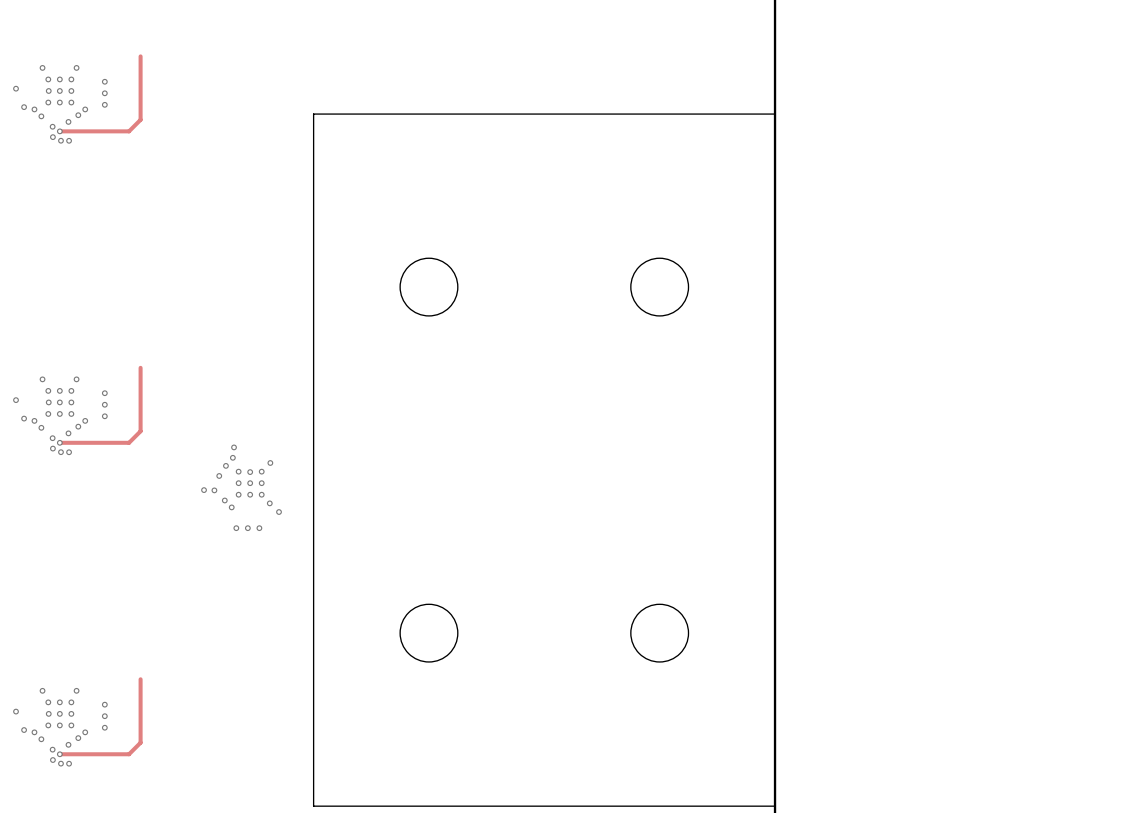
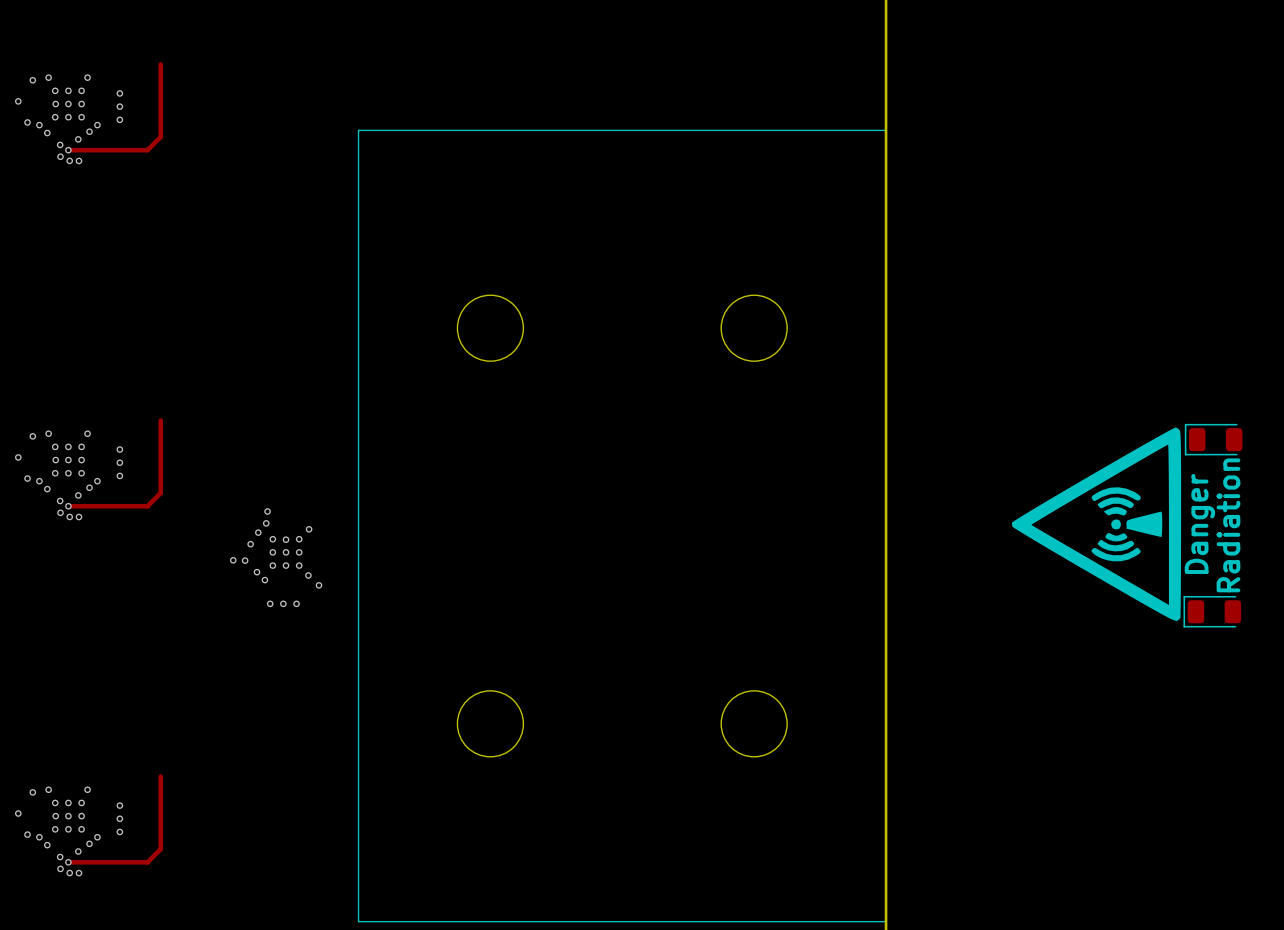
via: none -> (32, 80)
drawing: none -> [1011, 427, 1182, 621]
via: none -> (32, 436)
part: none -> (1213, 439)
text: none -> Danger (1199, 523)
text: none -> Radiation (1228, 525)
part: none -> (1212, 611)
via: none -> (32, 792)

